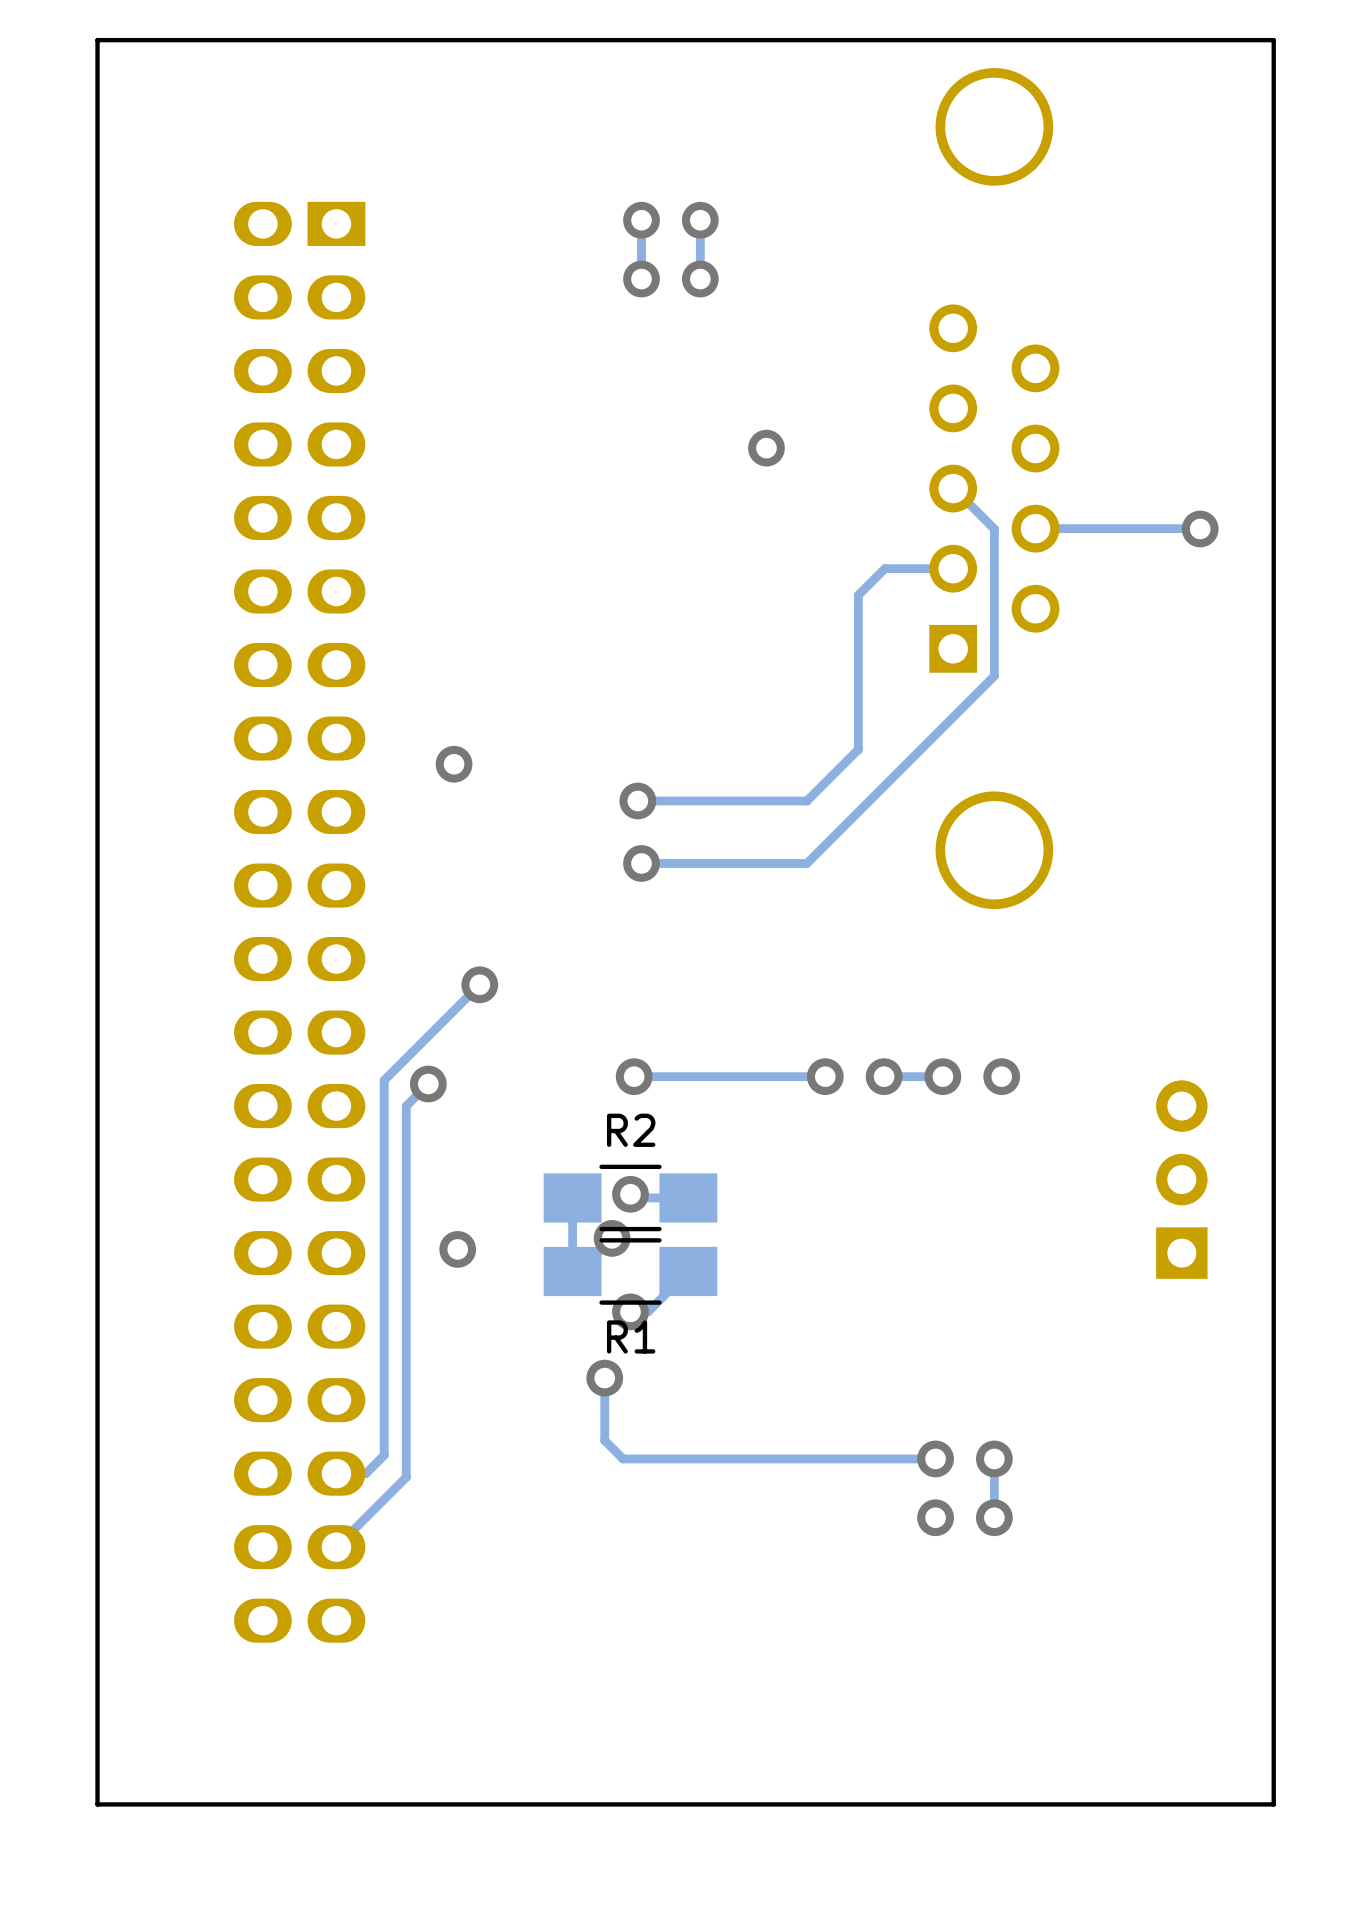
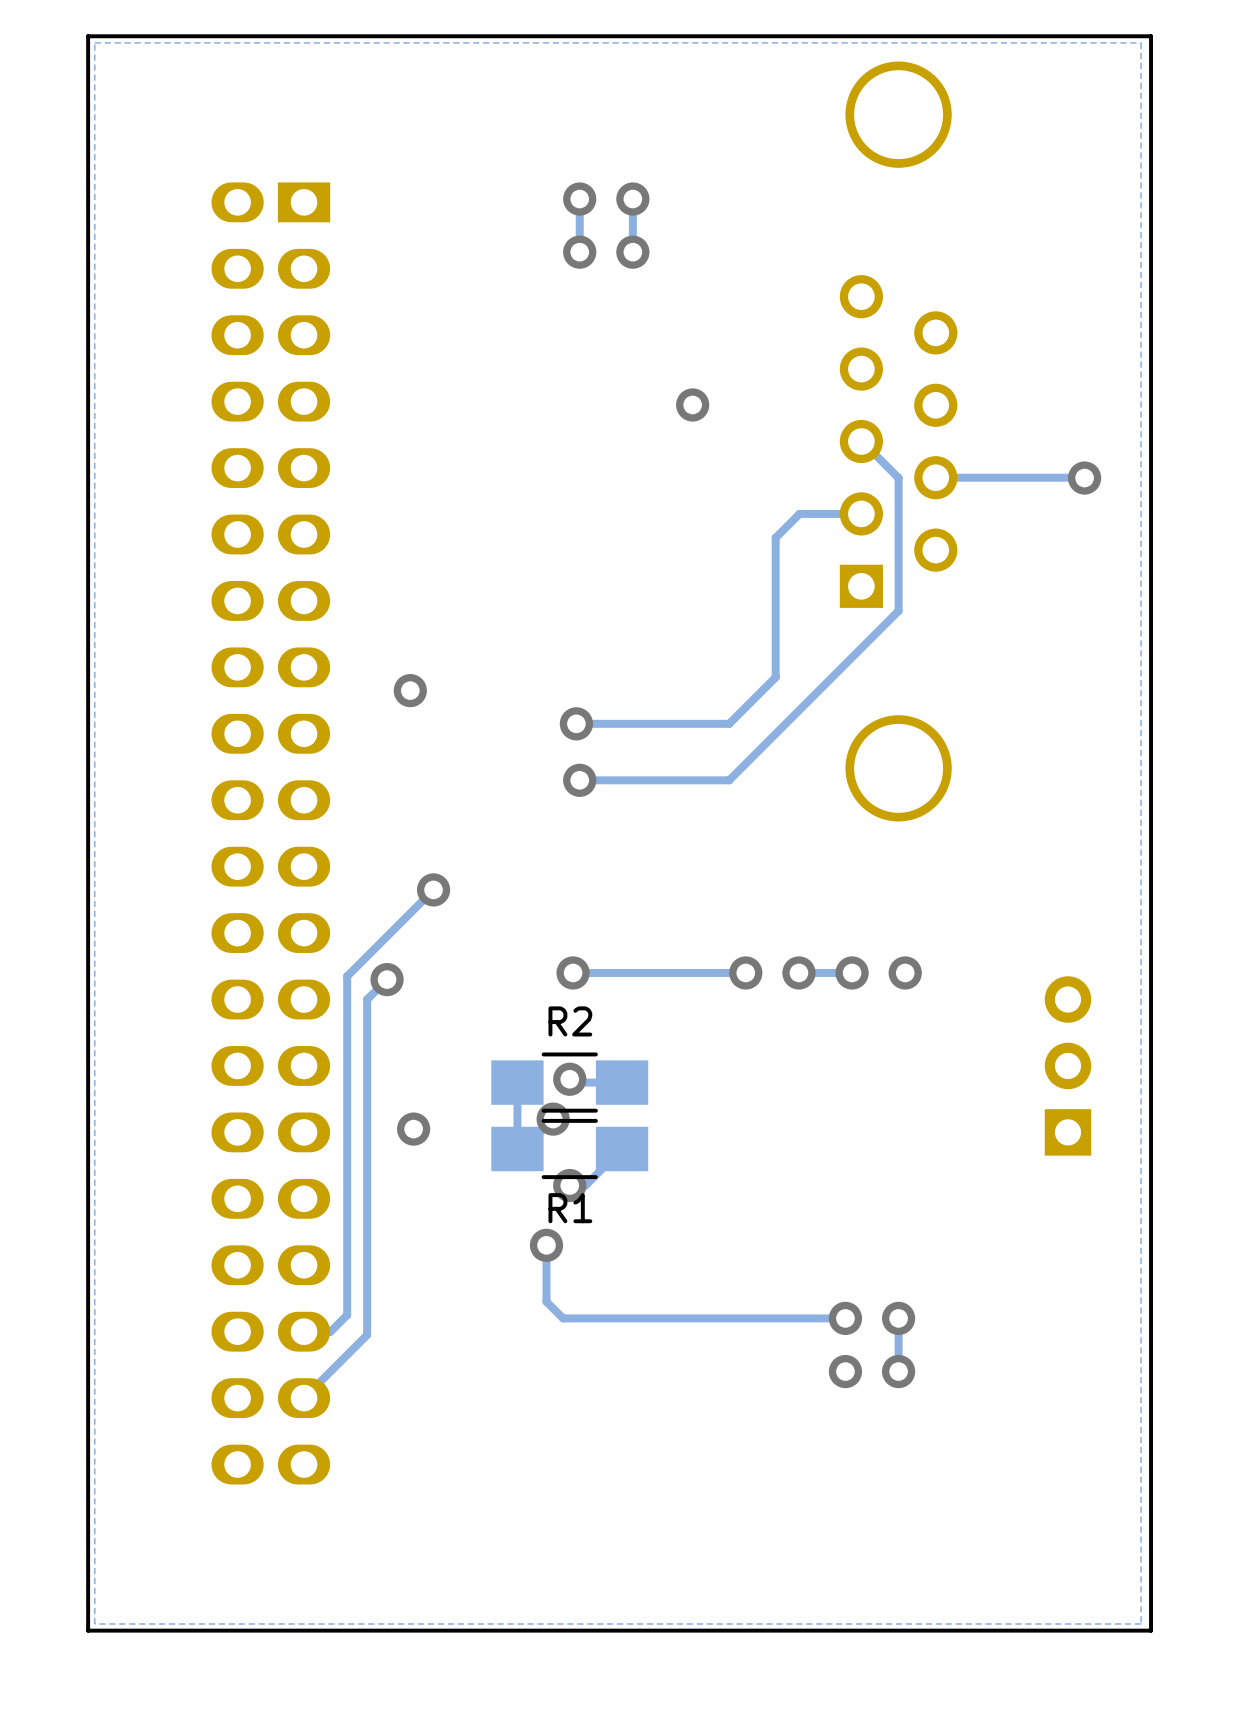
zone outline: none -> (1141, 42) (94, 42) (94, 1623) (1141, 1623) (1141, 42)

